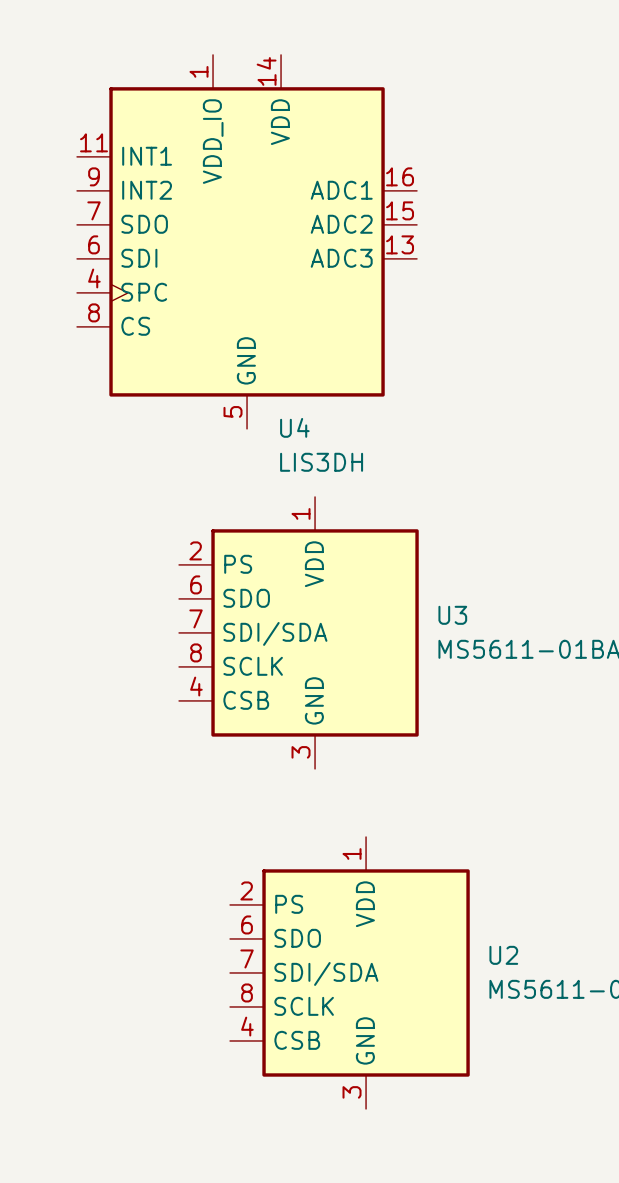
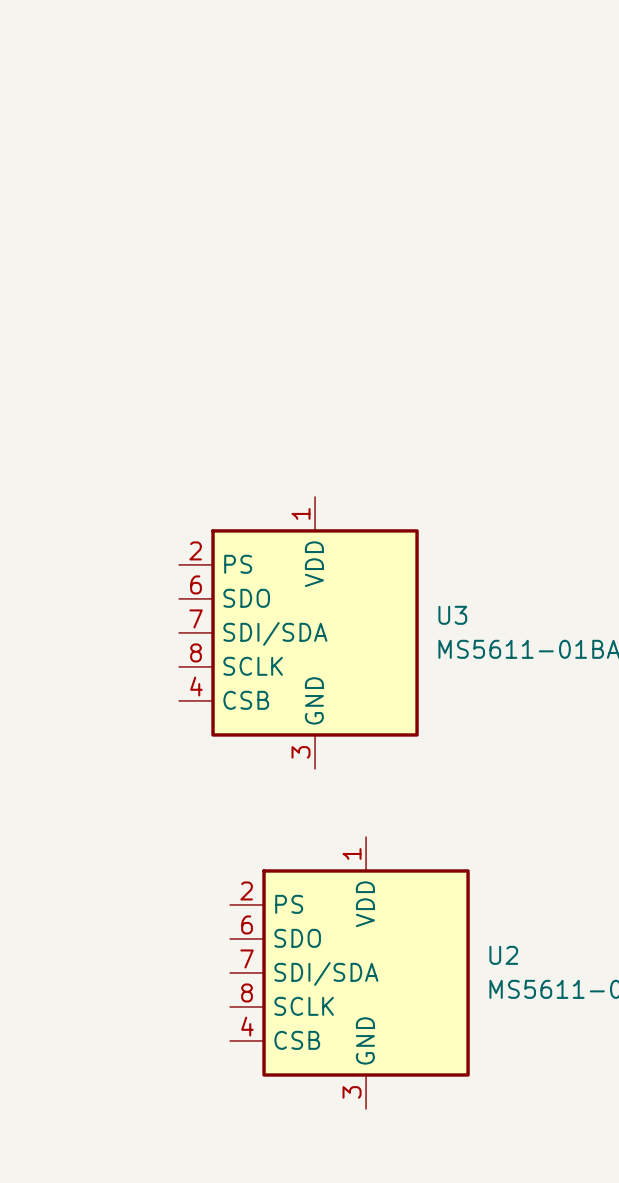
U4: LIS3DH (247, 241) -> none

